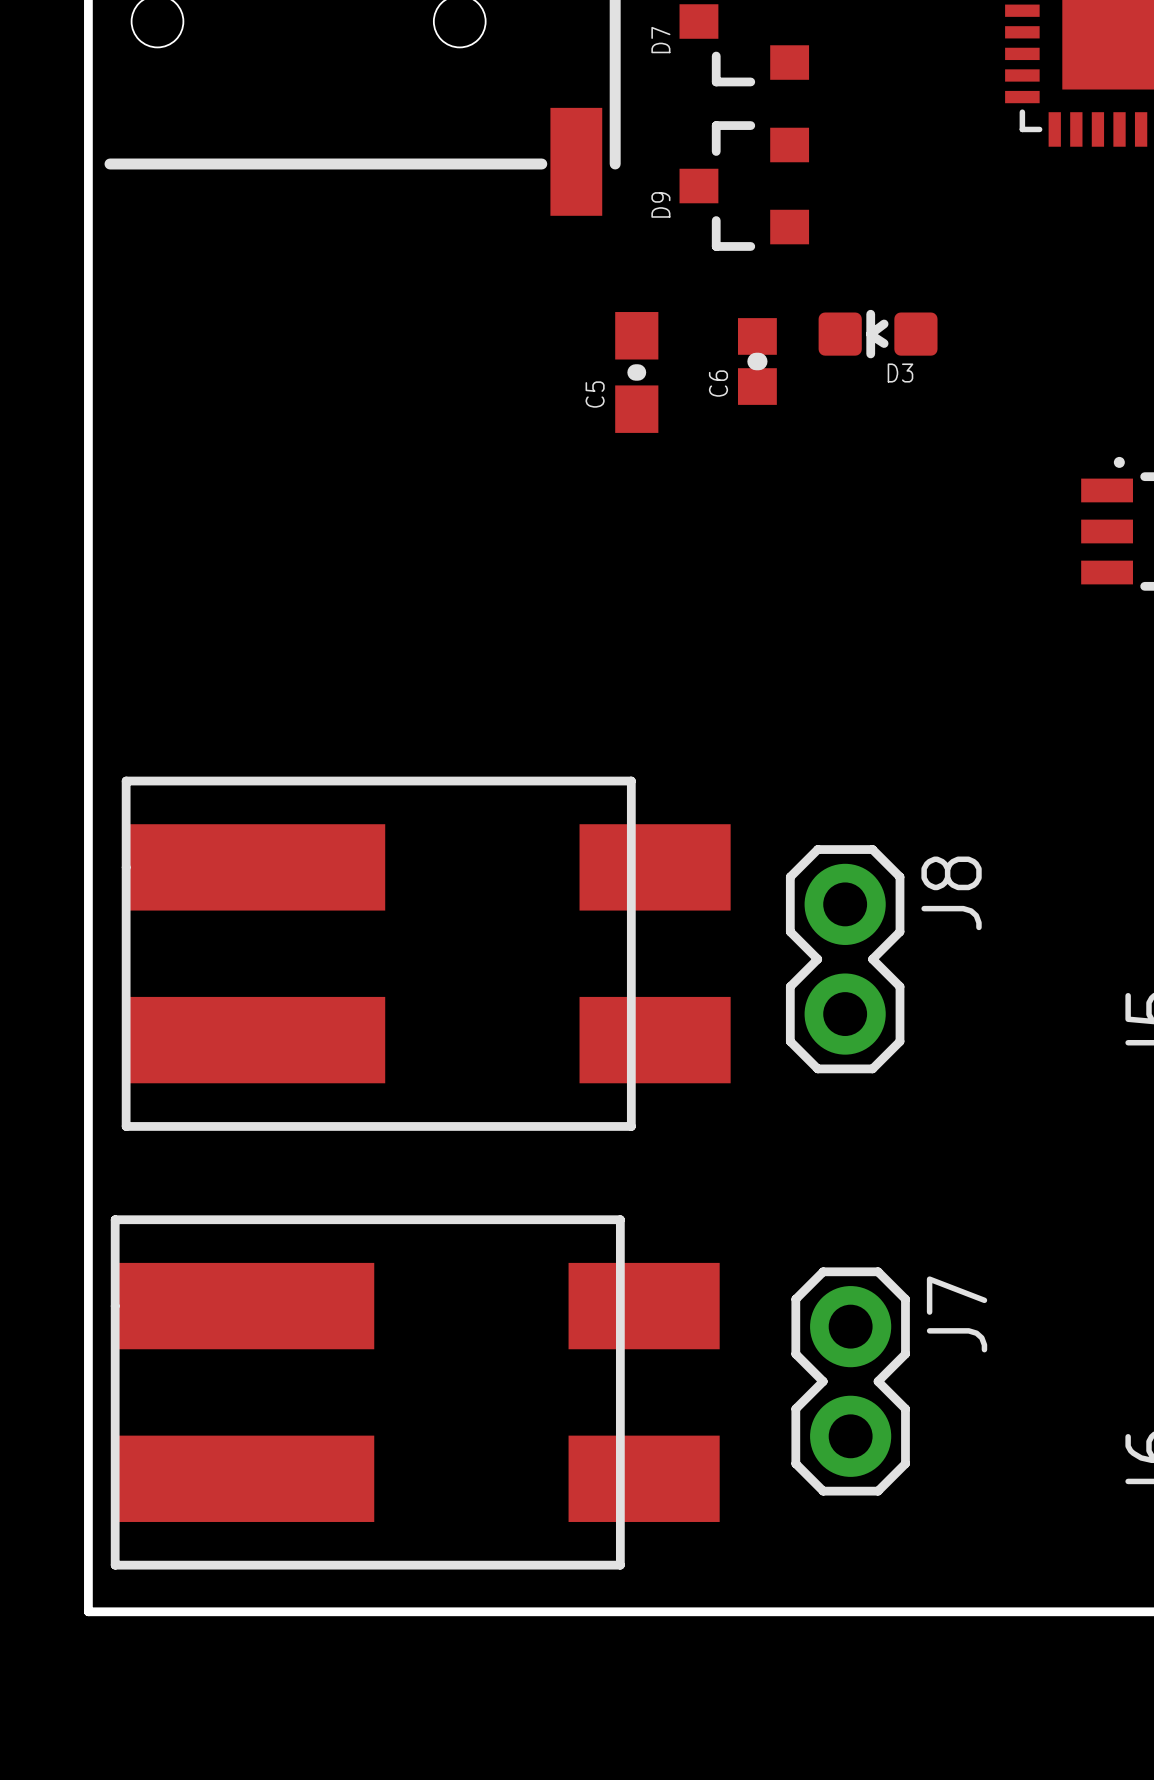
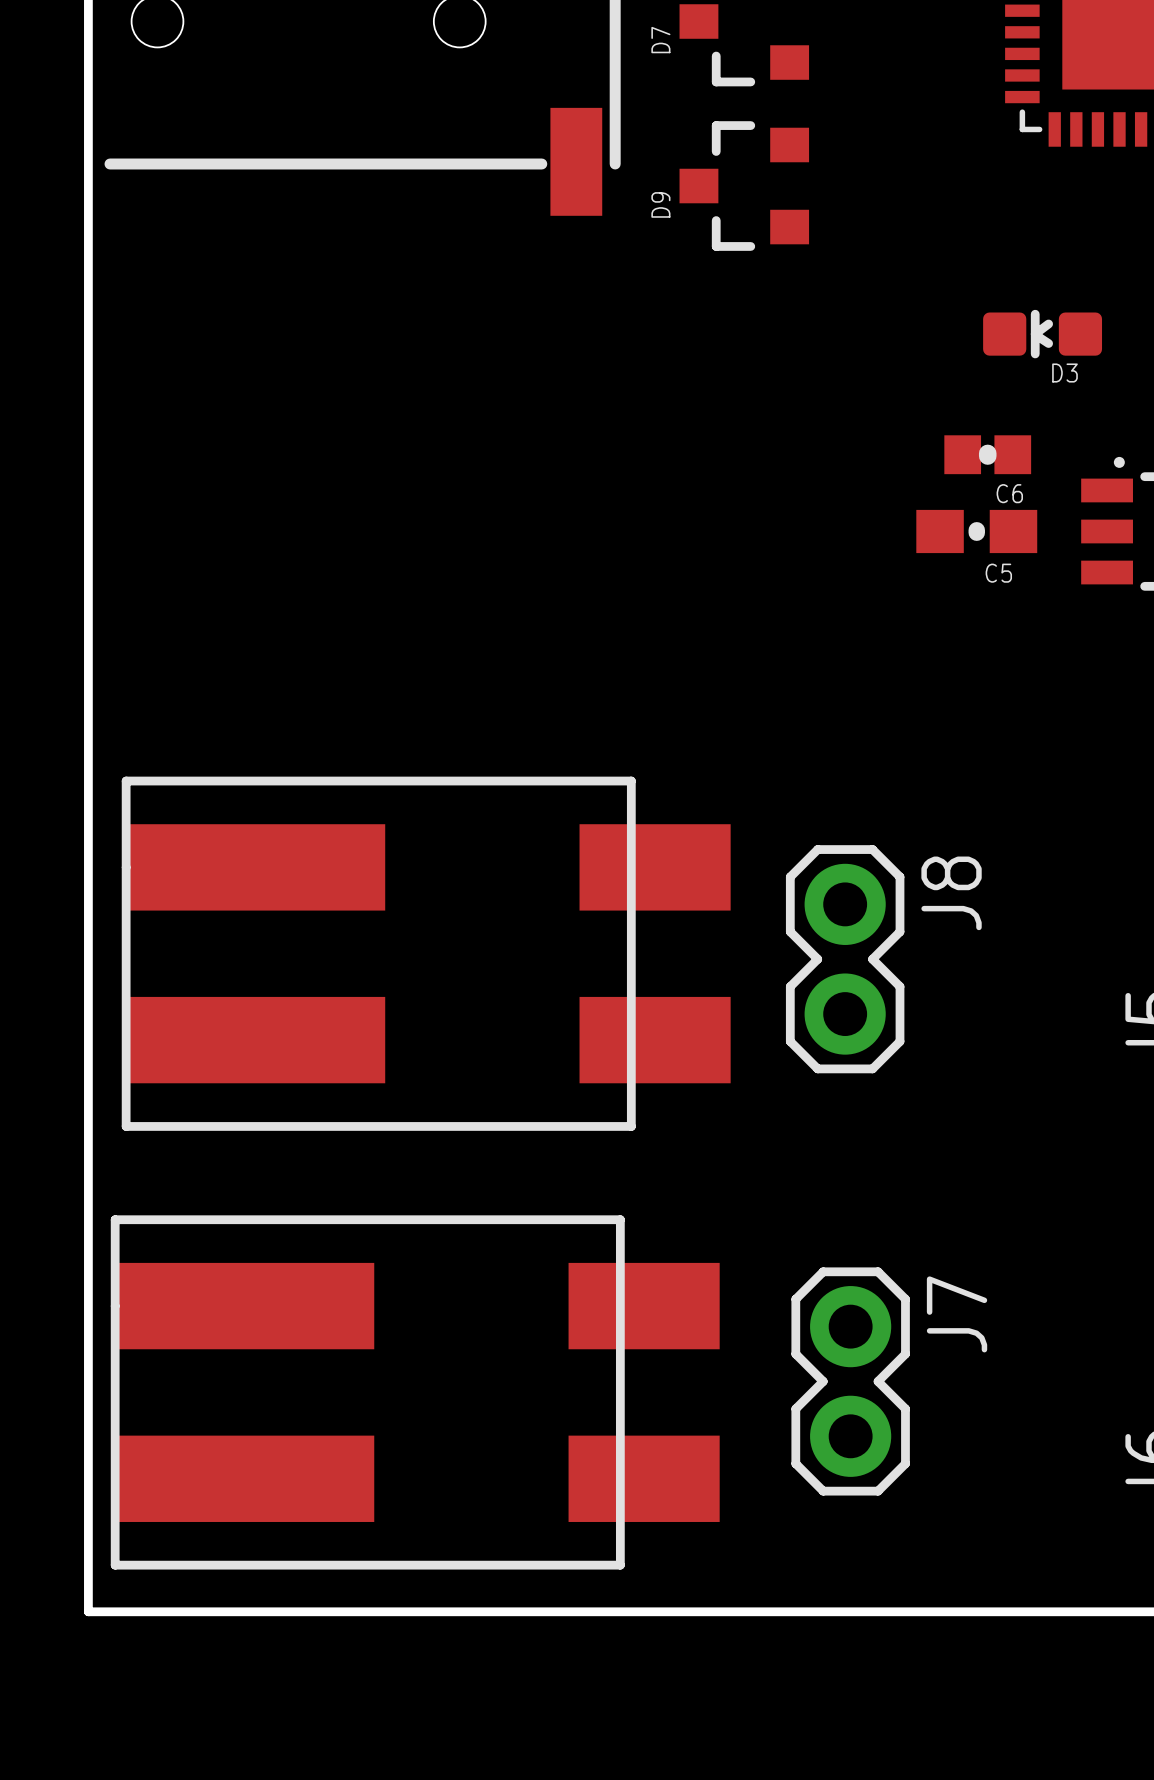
D3 position: (878, 334) -> (1042, 334)
C6 rotation: 0° (757, 361) -> 90° clockwise (987, 454)
C6 position: (757, 361) -> (987, 454)
C5 rotation: 0° (636, 372) -> 90° clockwise (976, 531)
C5 position: (636, 372) -> (976, 531)

